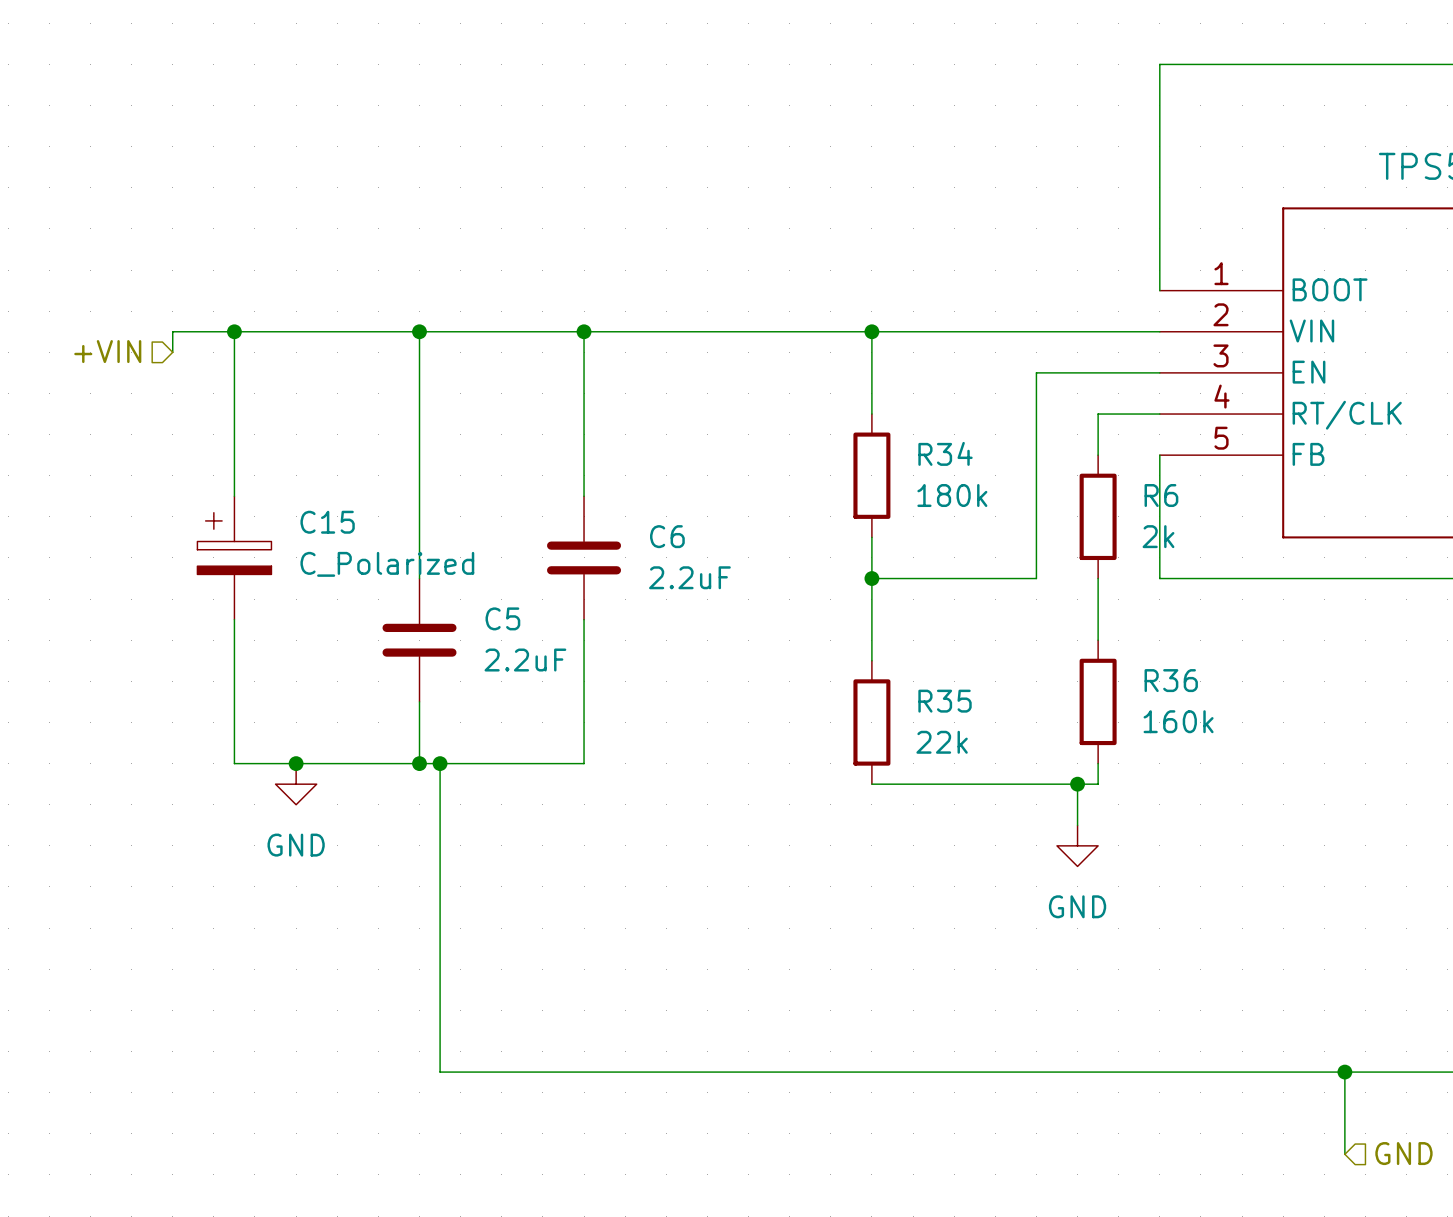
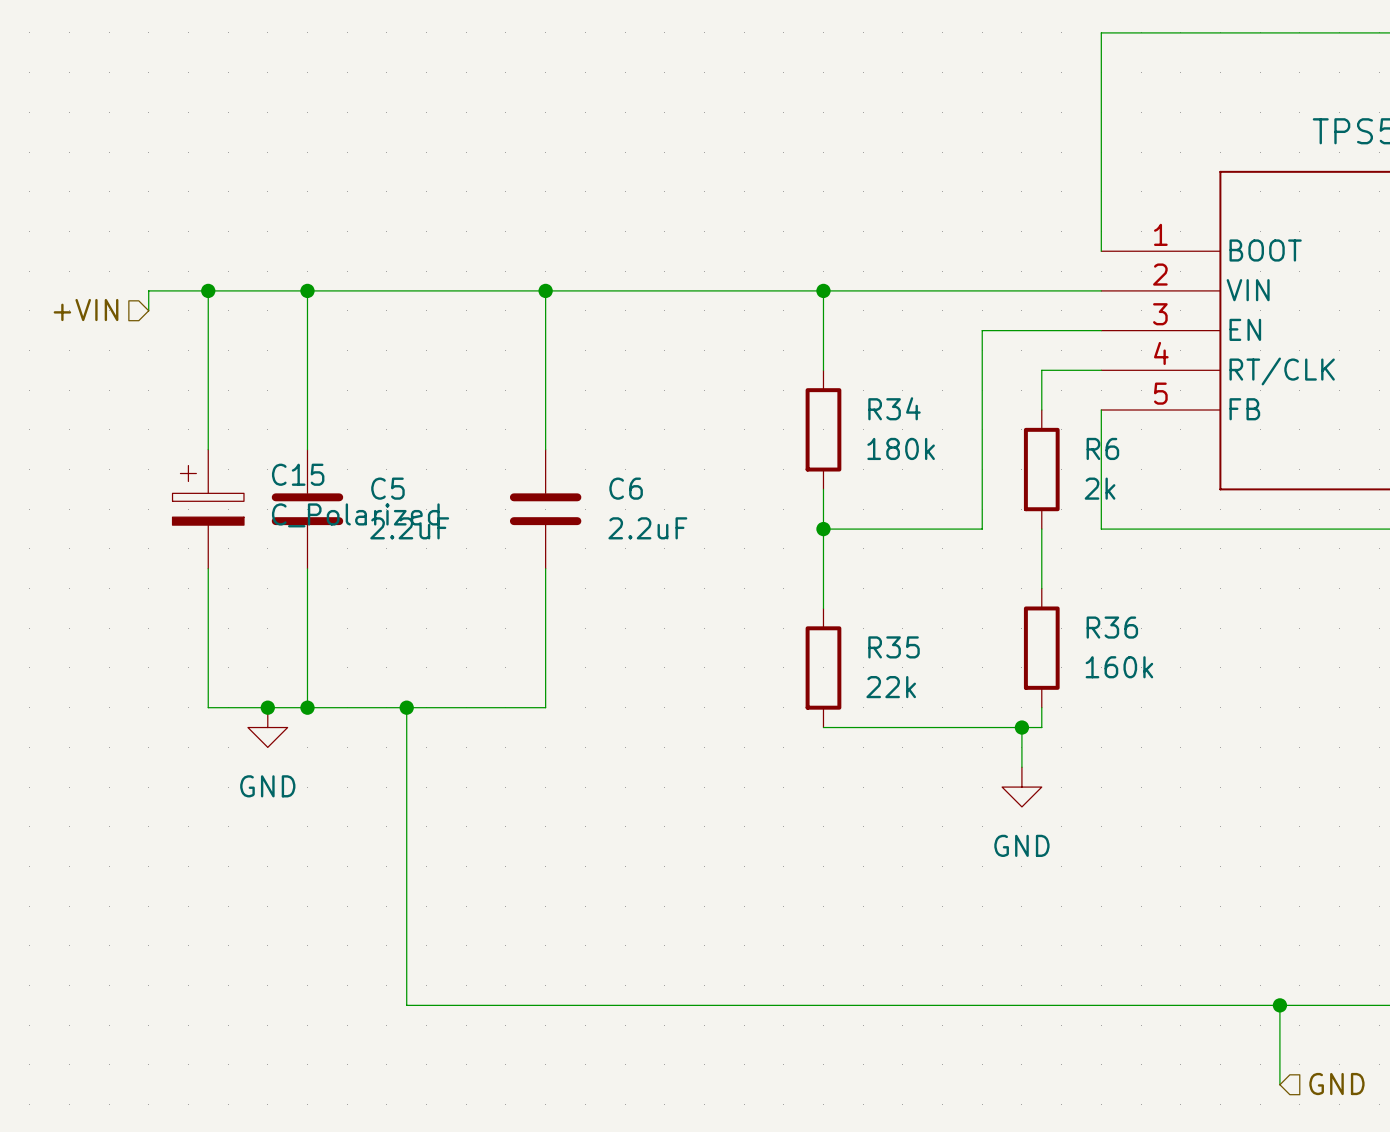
wire: none -> (307, 290) (307, 449)
wire: (419, 331) (419, 578) -> none
junction position: (419, 331) -> (307, 290)
wire: none -> (307, 568) (307, 707)
C5 position: (419, 640) -> (307, 509)
wire: (419, 701) (419, 763) -> none
junction position: (419, 763) -> (307, 707)

